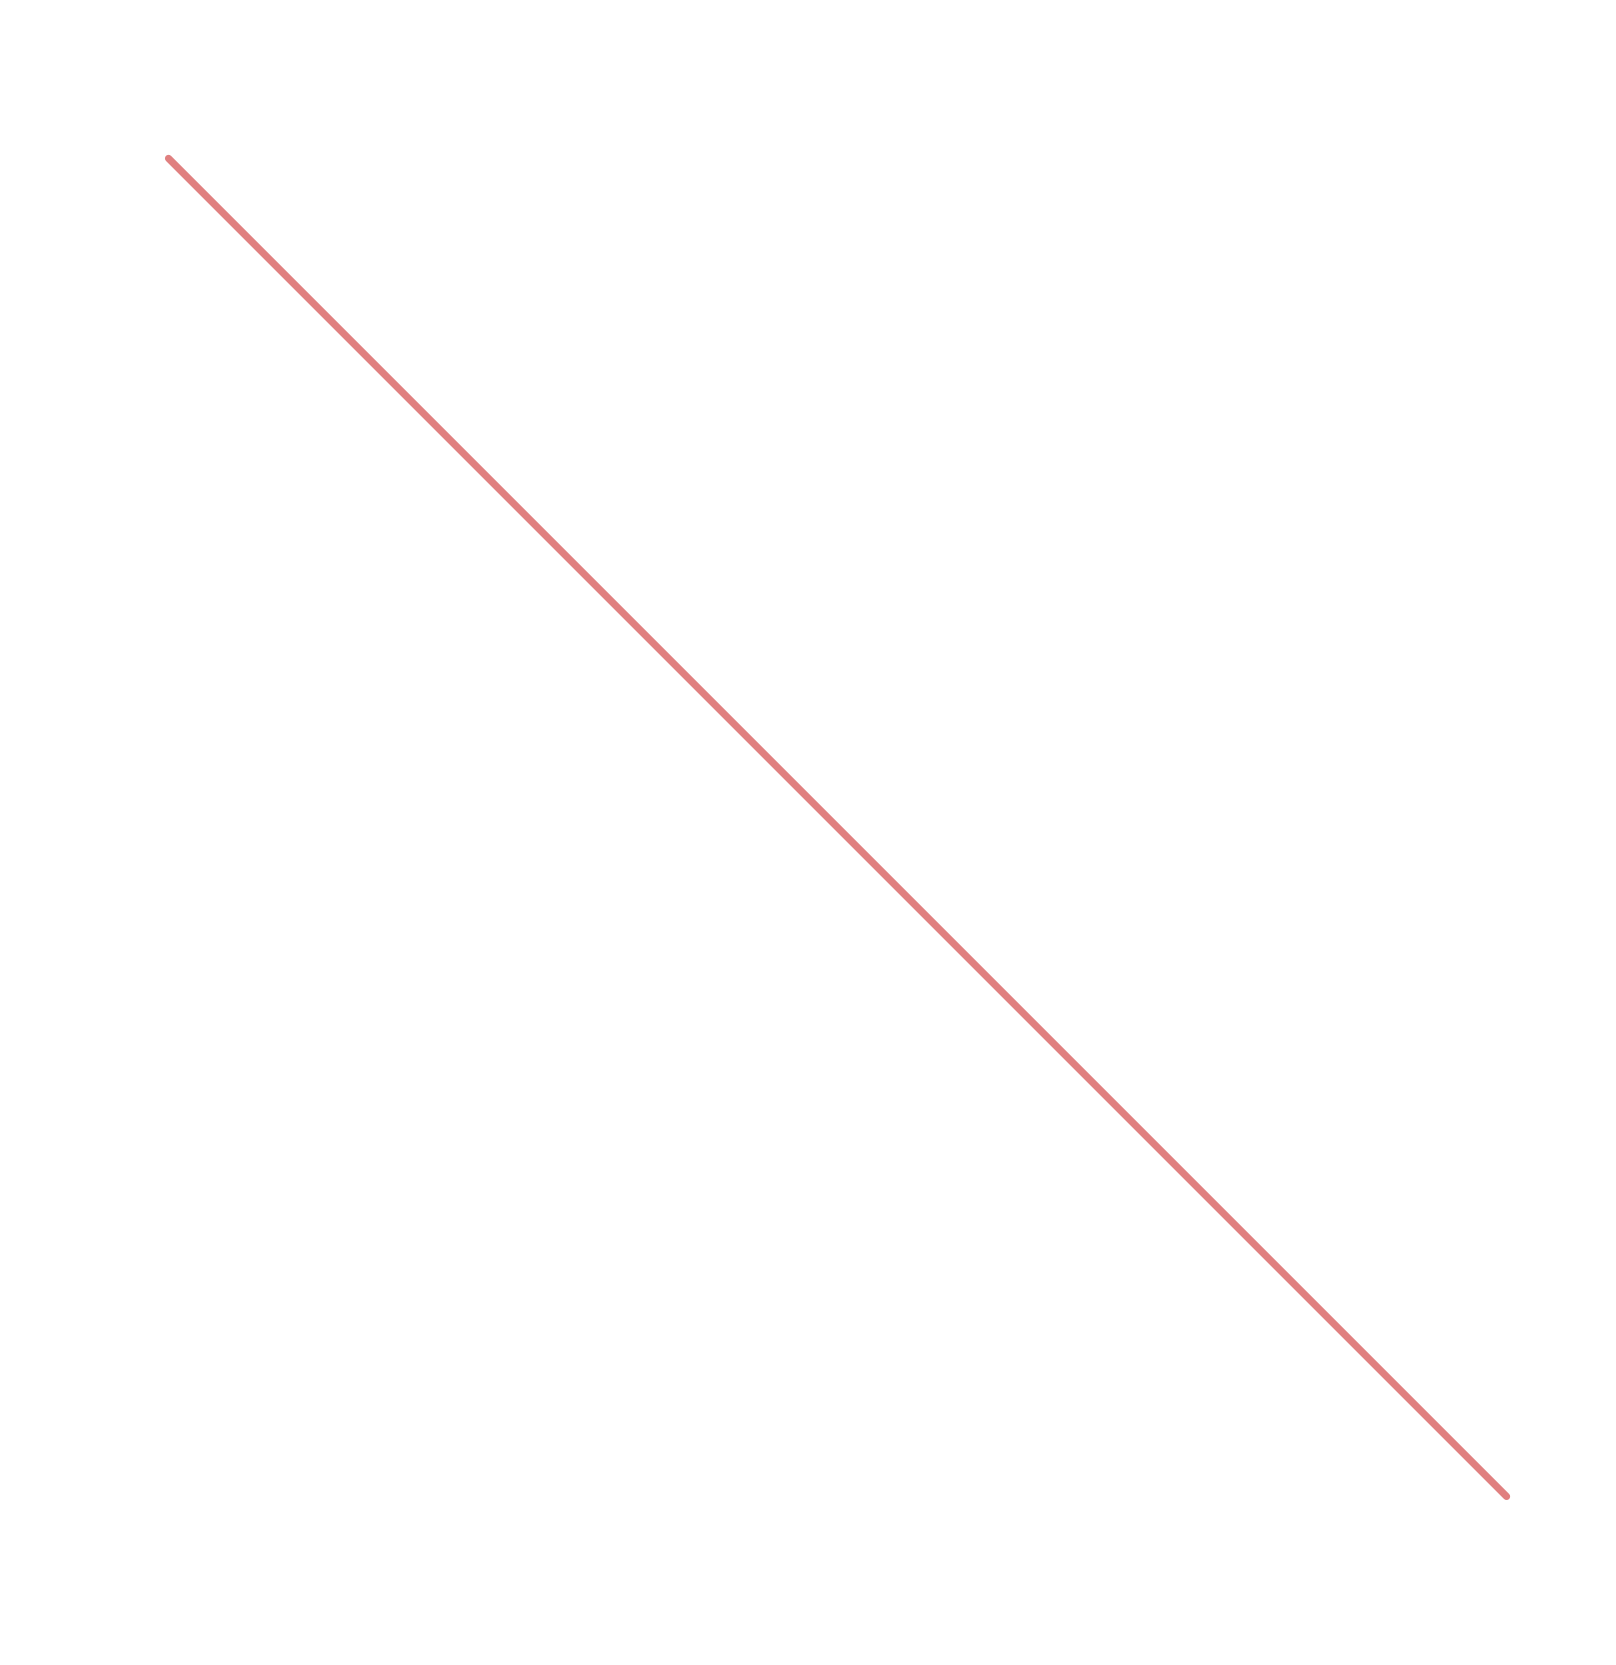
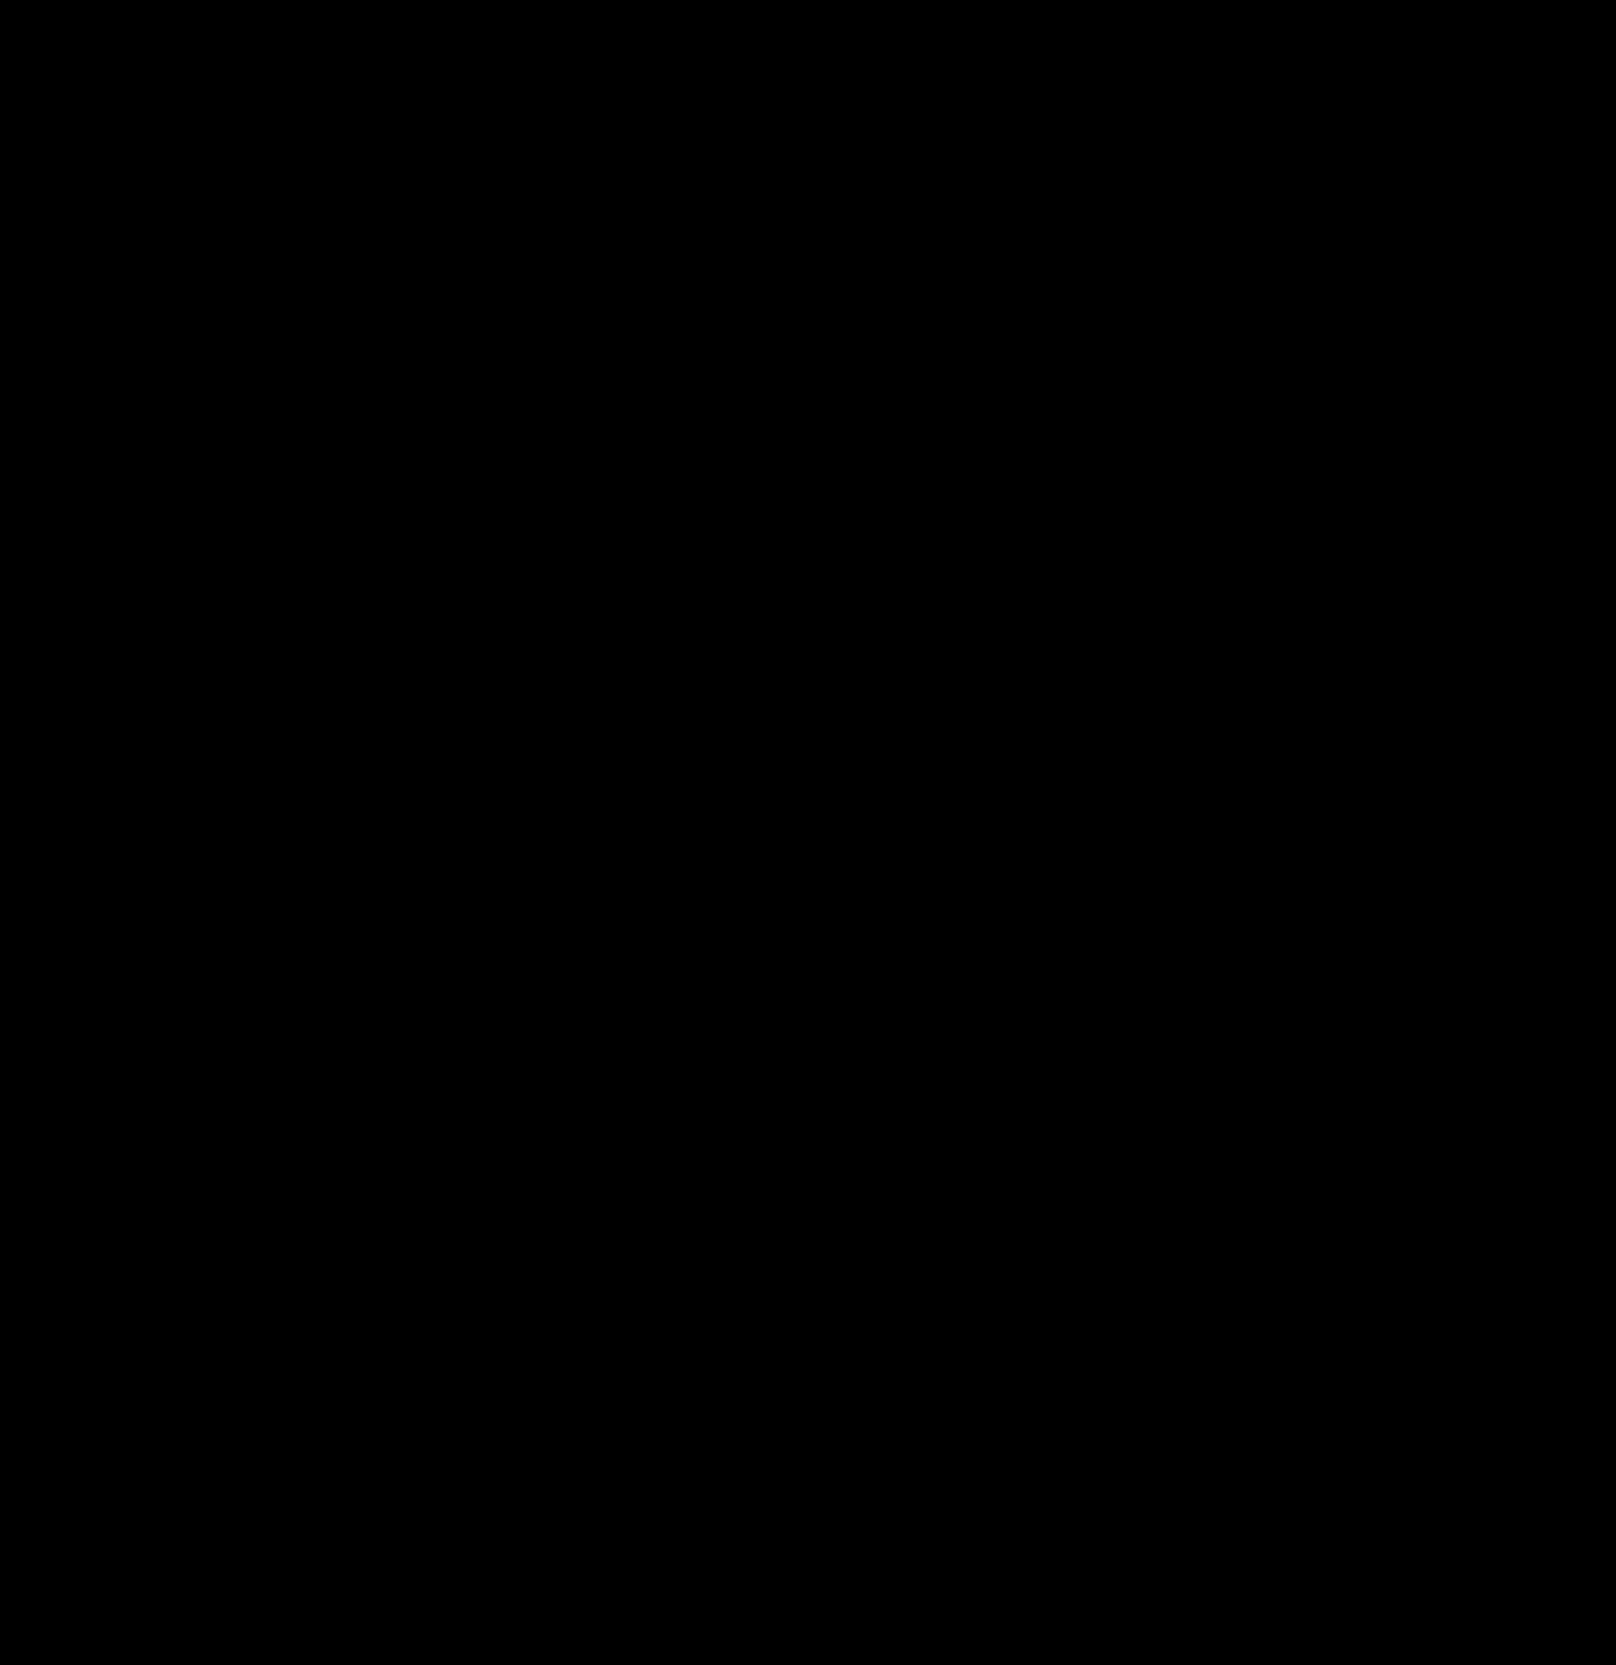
top track: (168, 158) (1506, 1496) -> none

